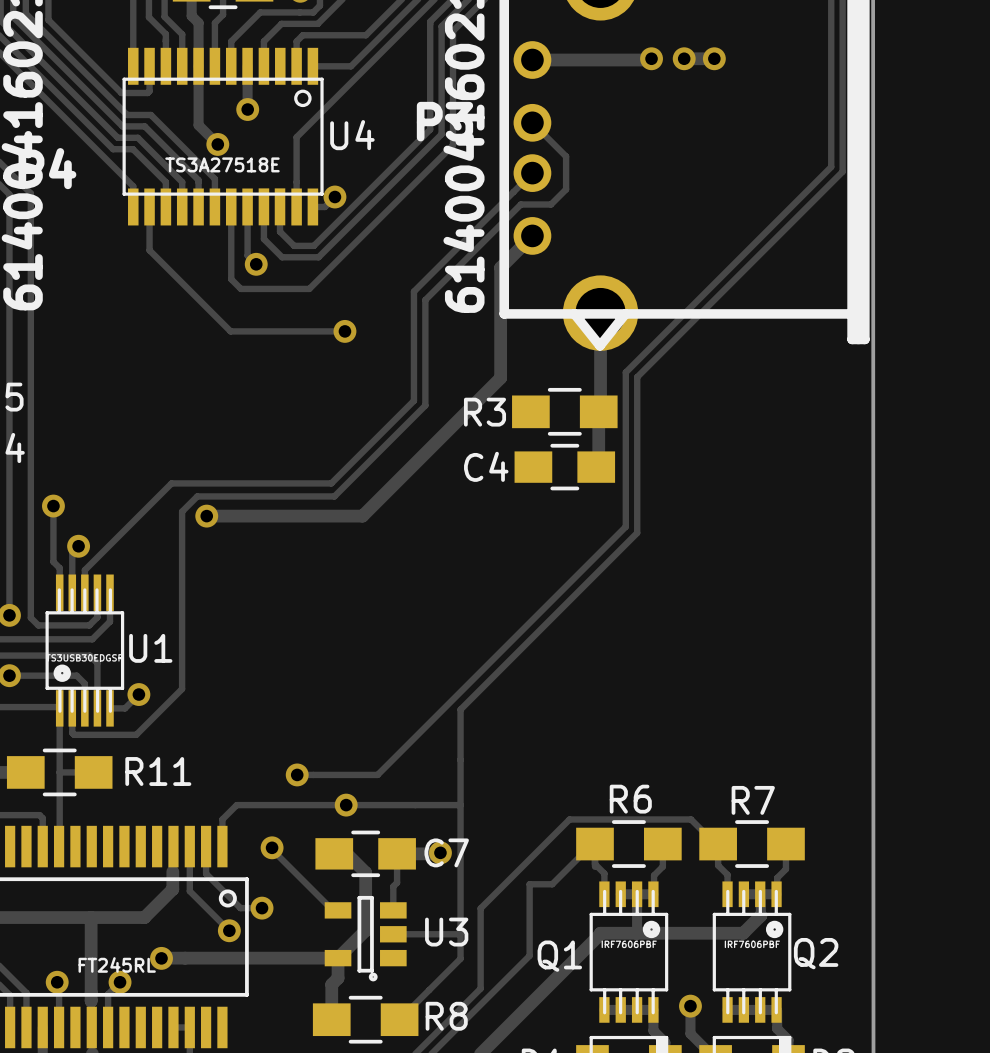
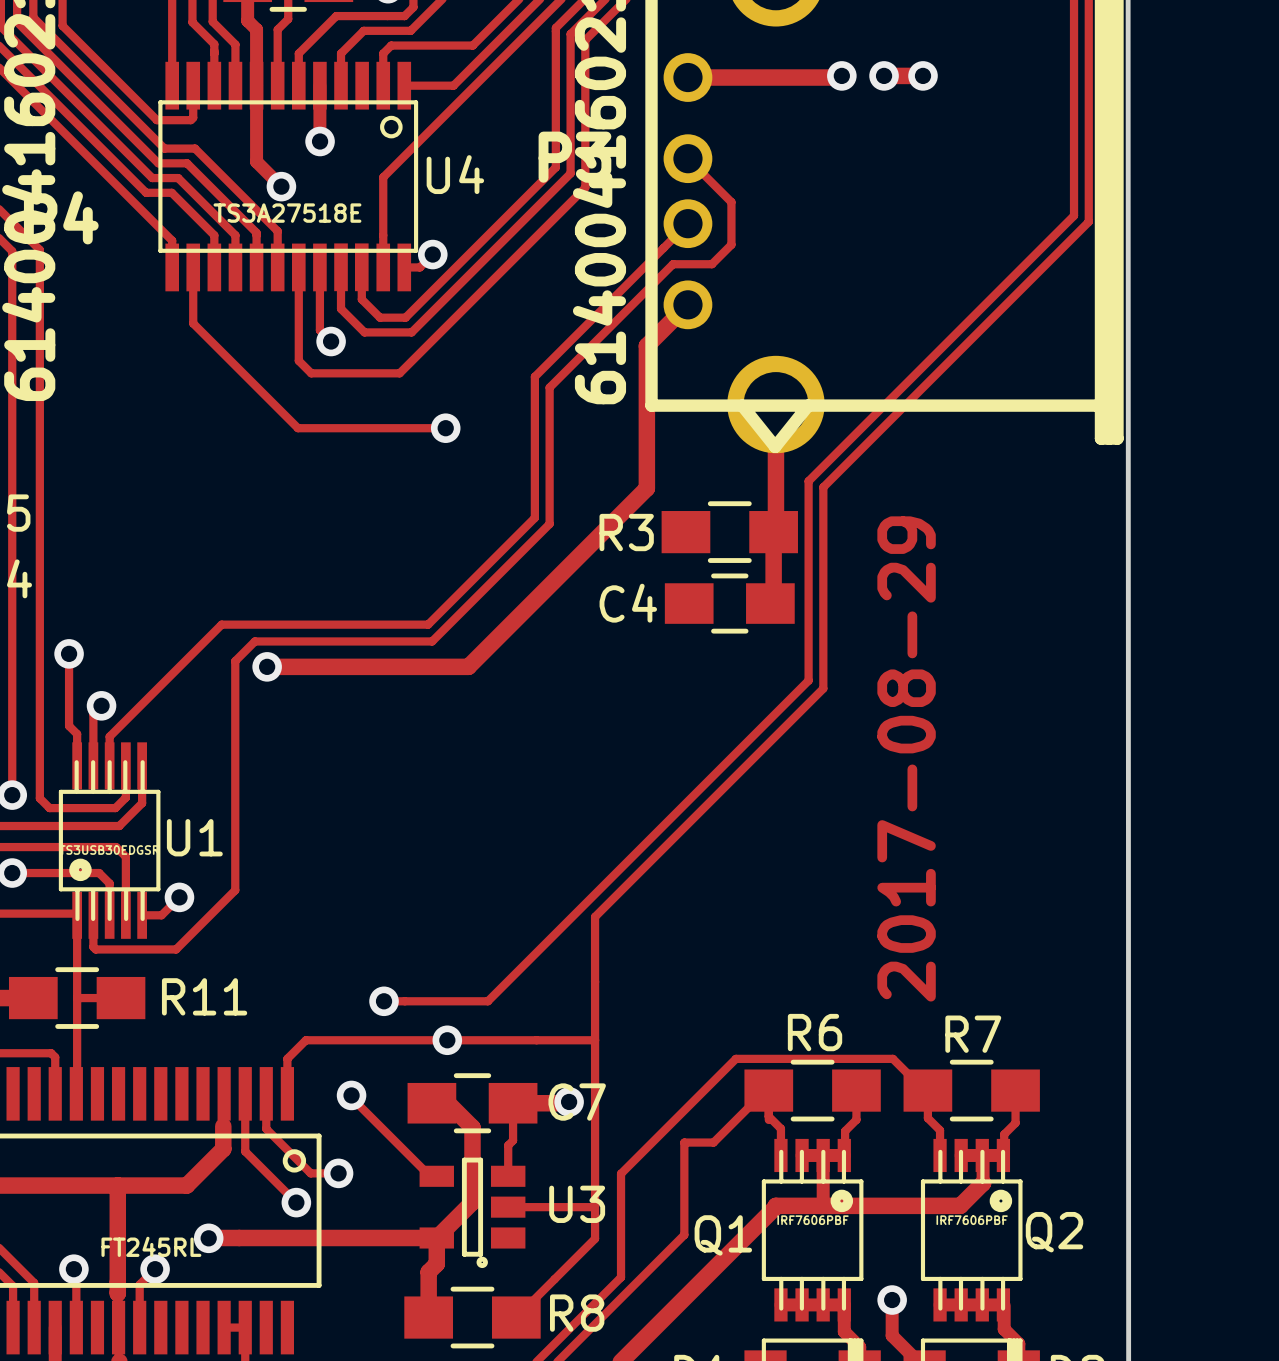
text: none -> 2017-08-29 (906, 758)

